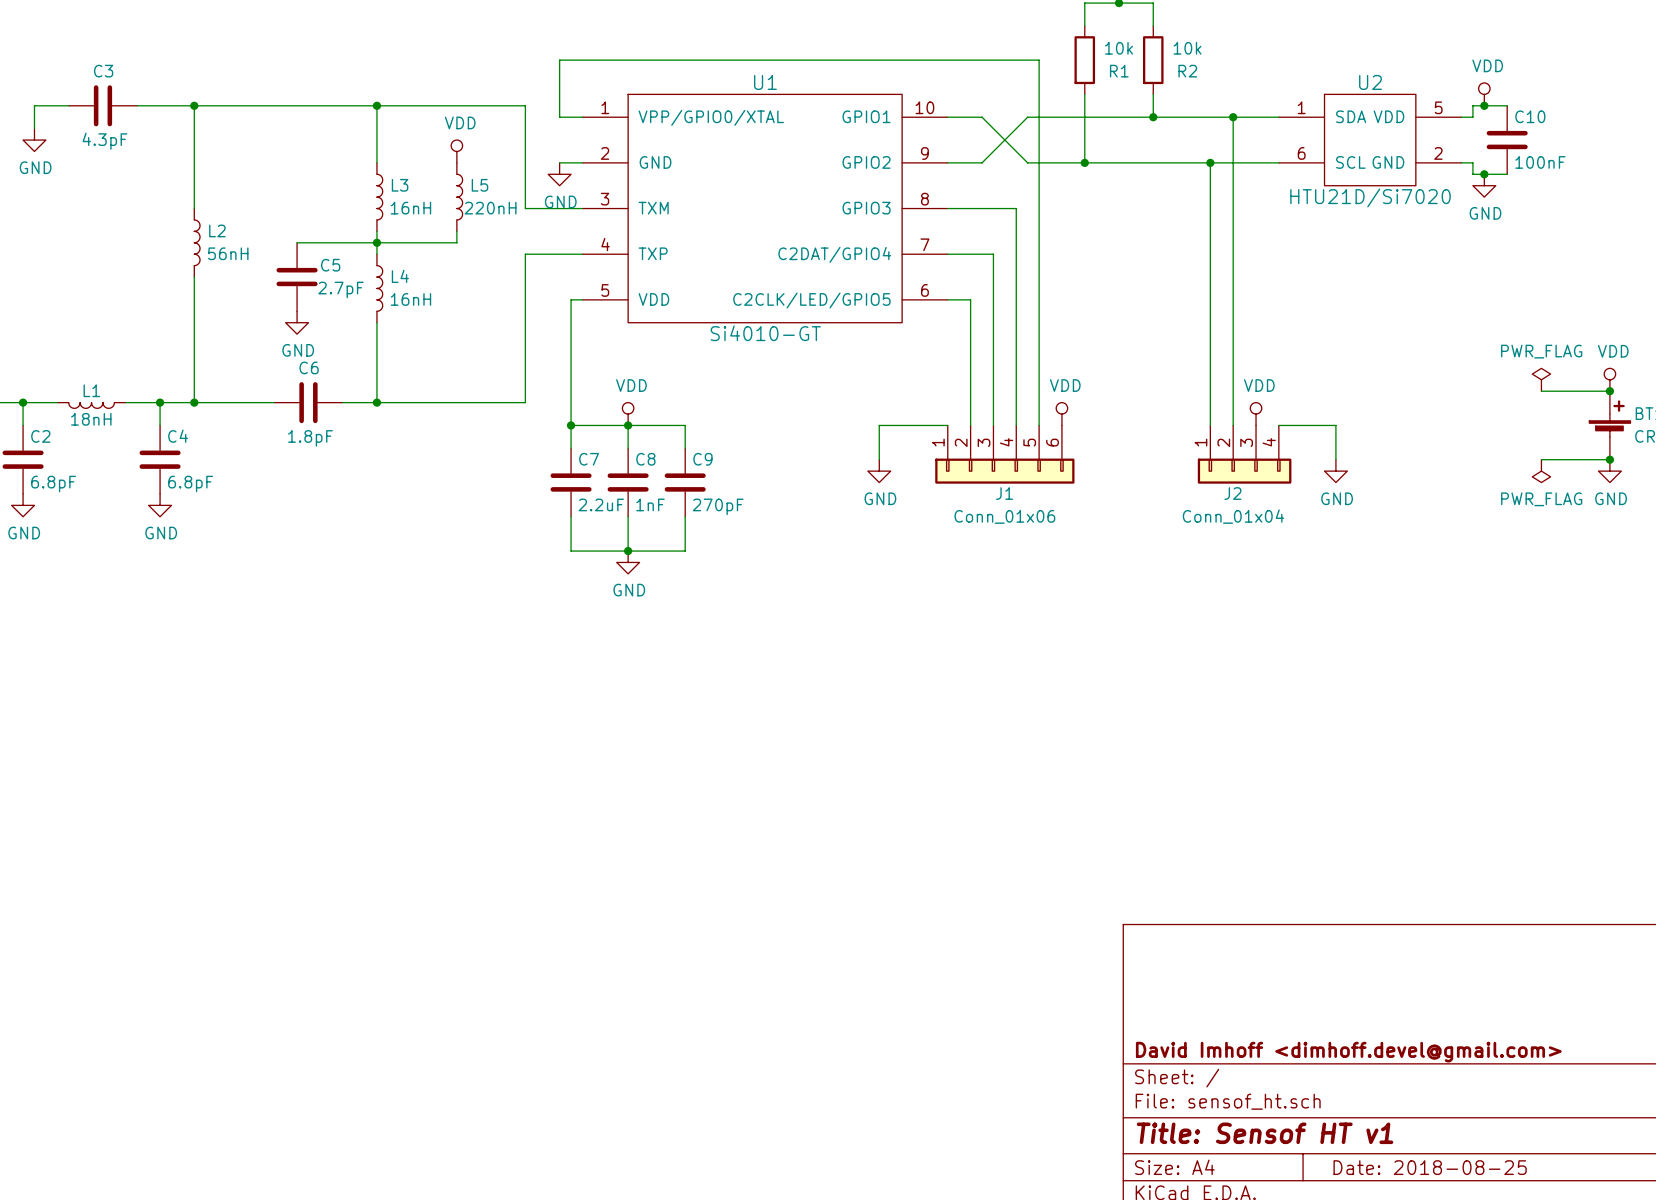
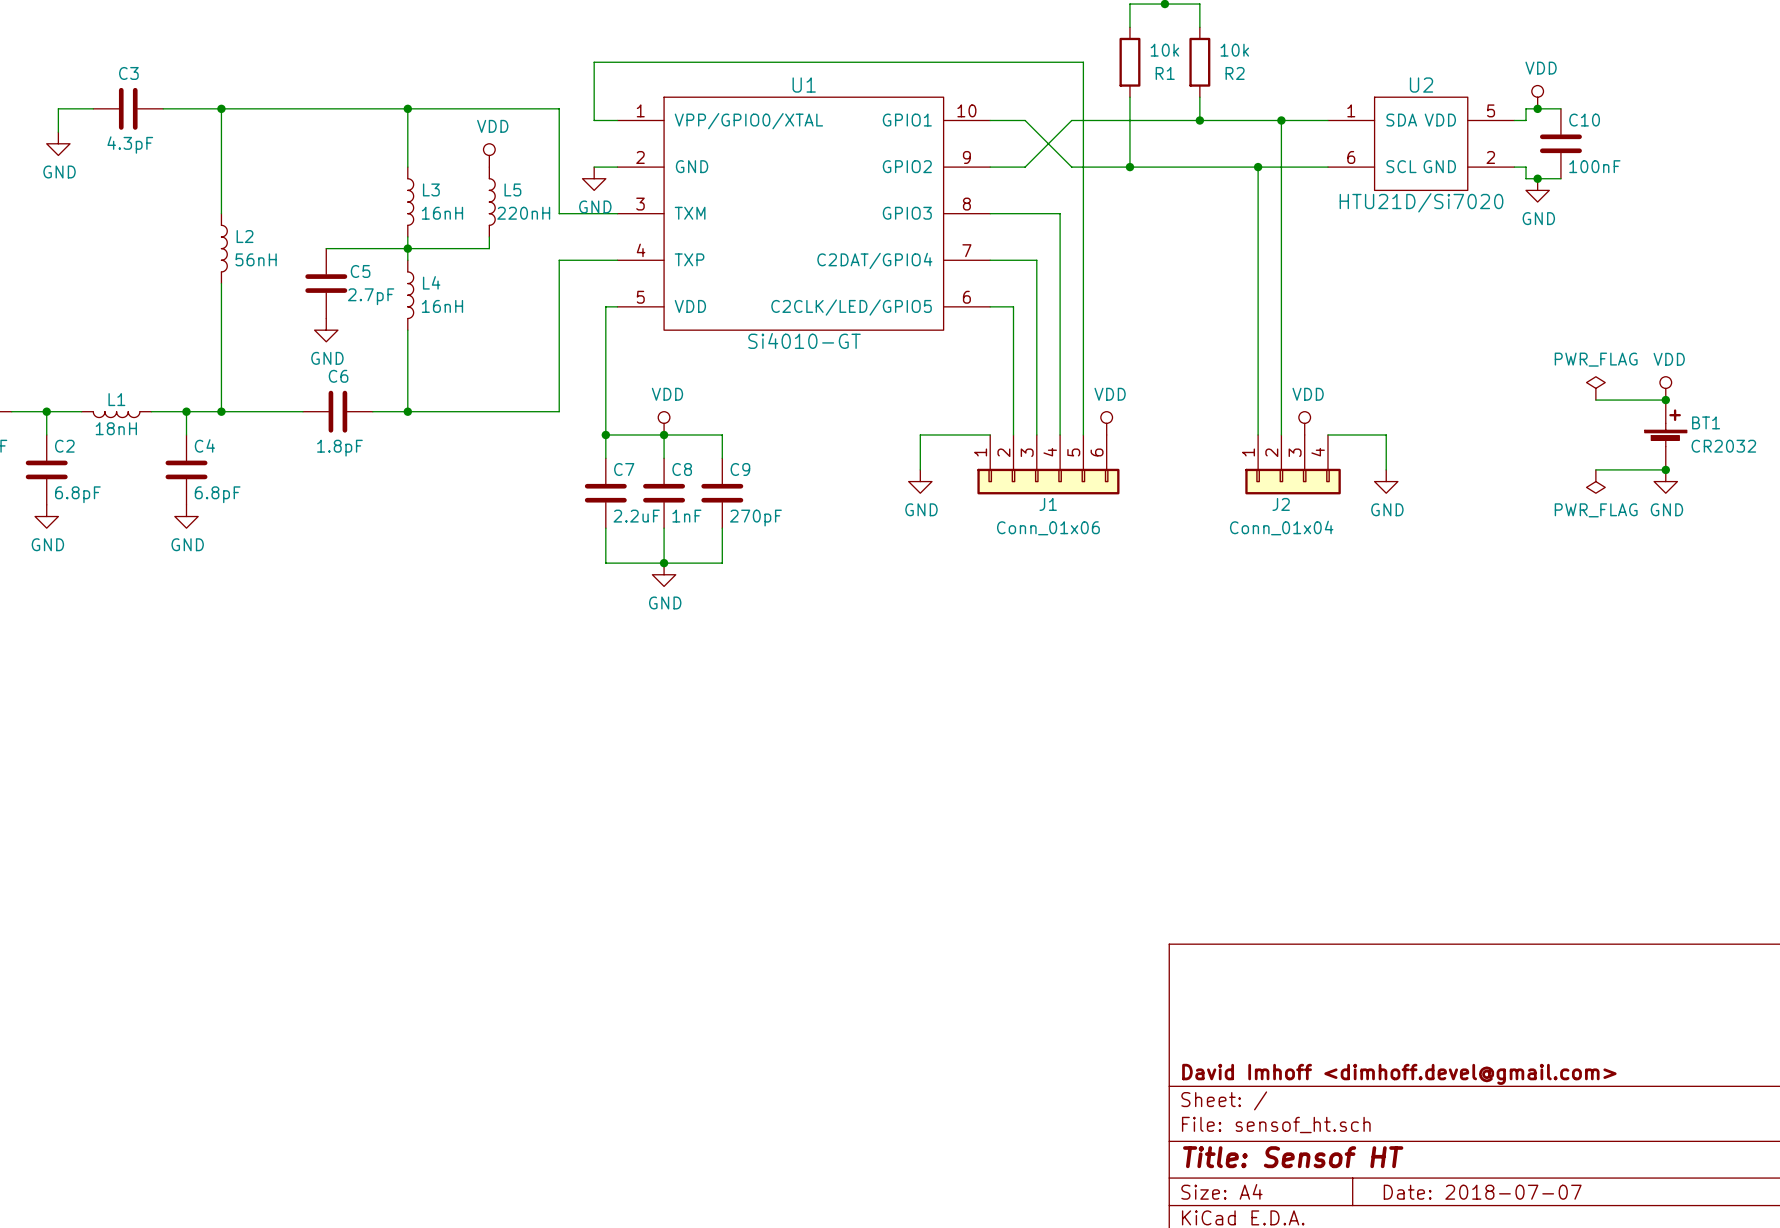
title block: Title: Sensof HT v1 (1265, 1133) -> Title: Sensof HT (1293, 1157)
title block: Date: 2018-08-25 (1430, 1167) -> Date: 2018-07-07 (1482, 1192)

